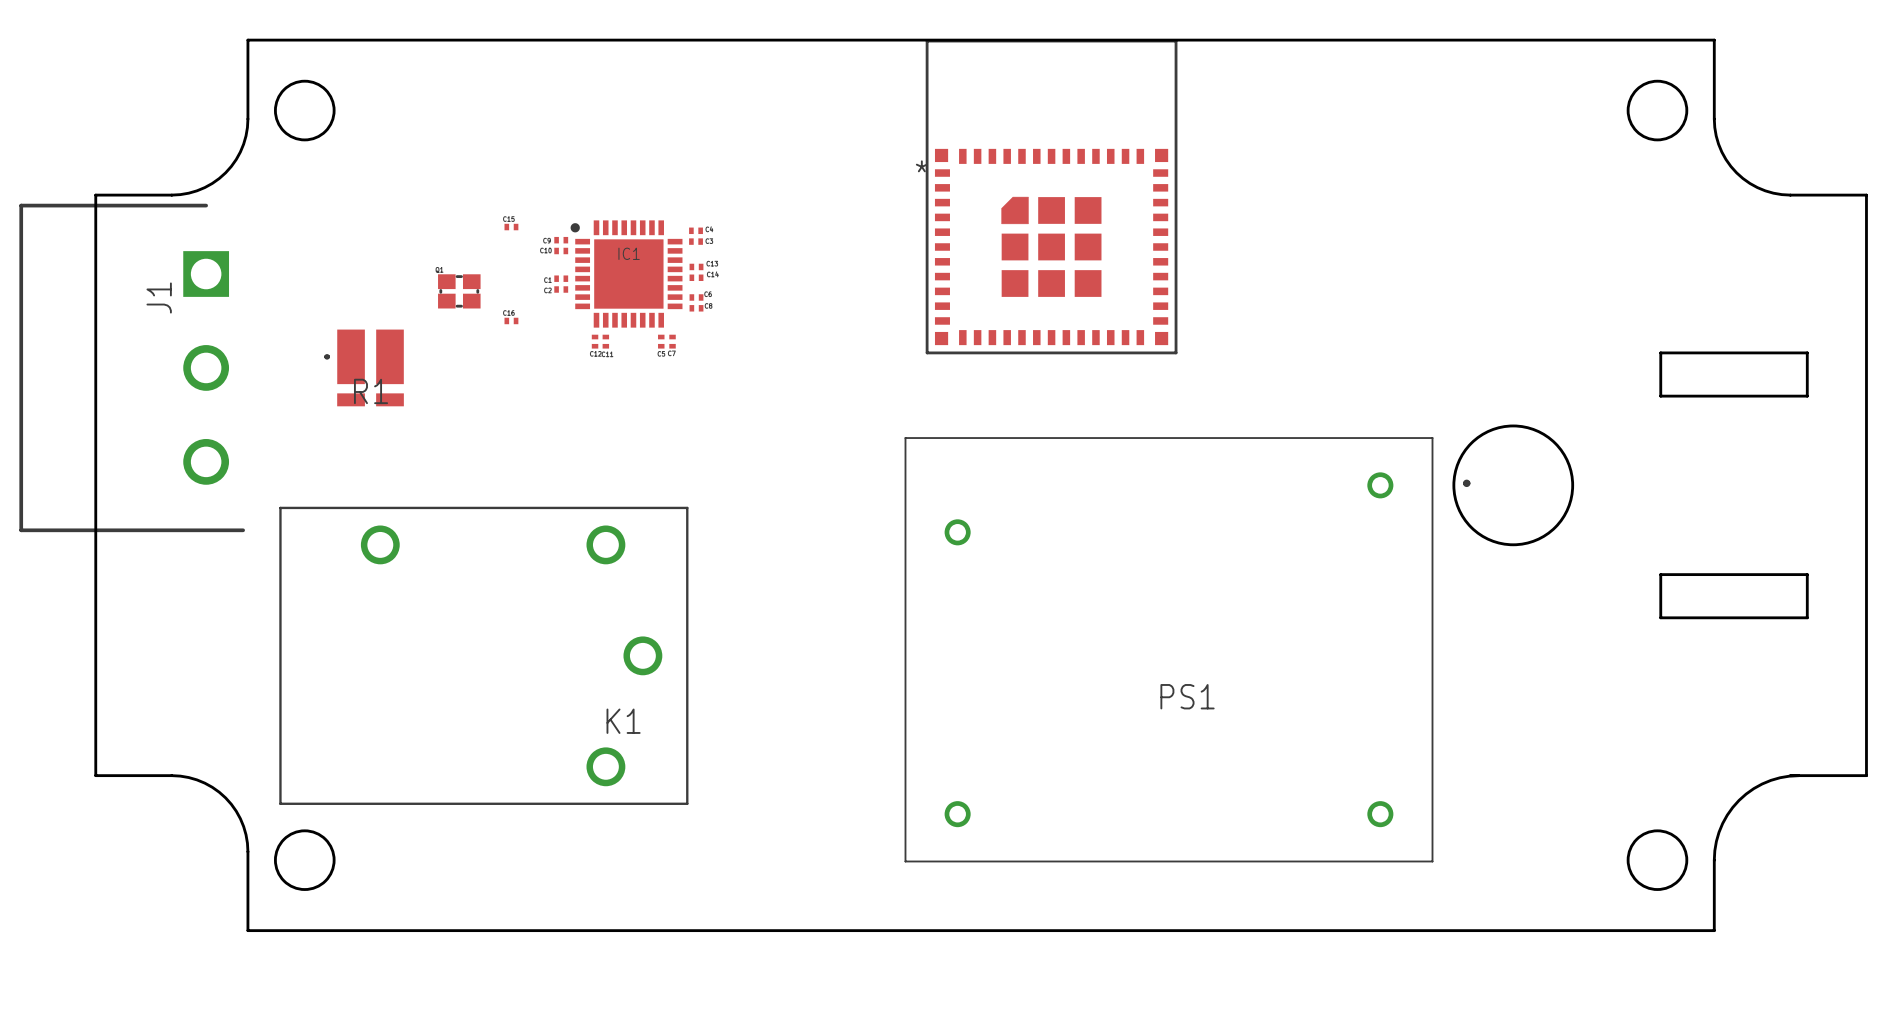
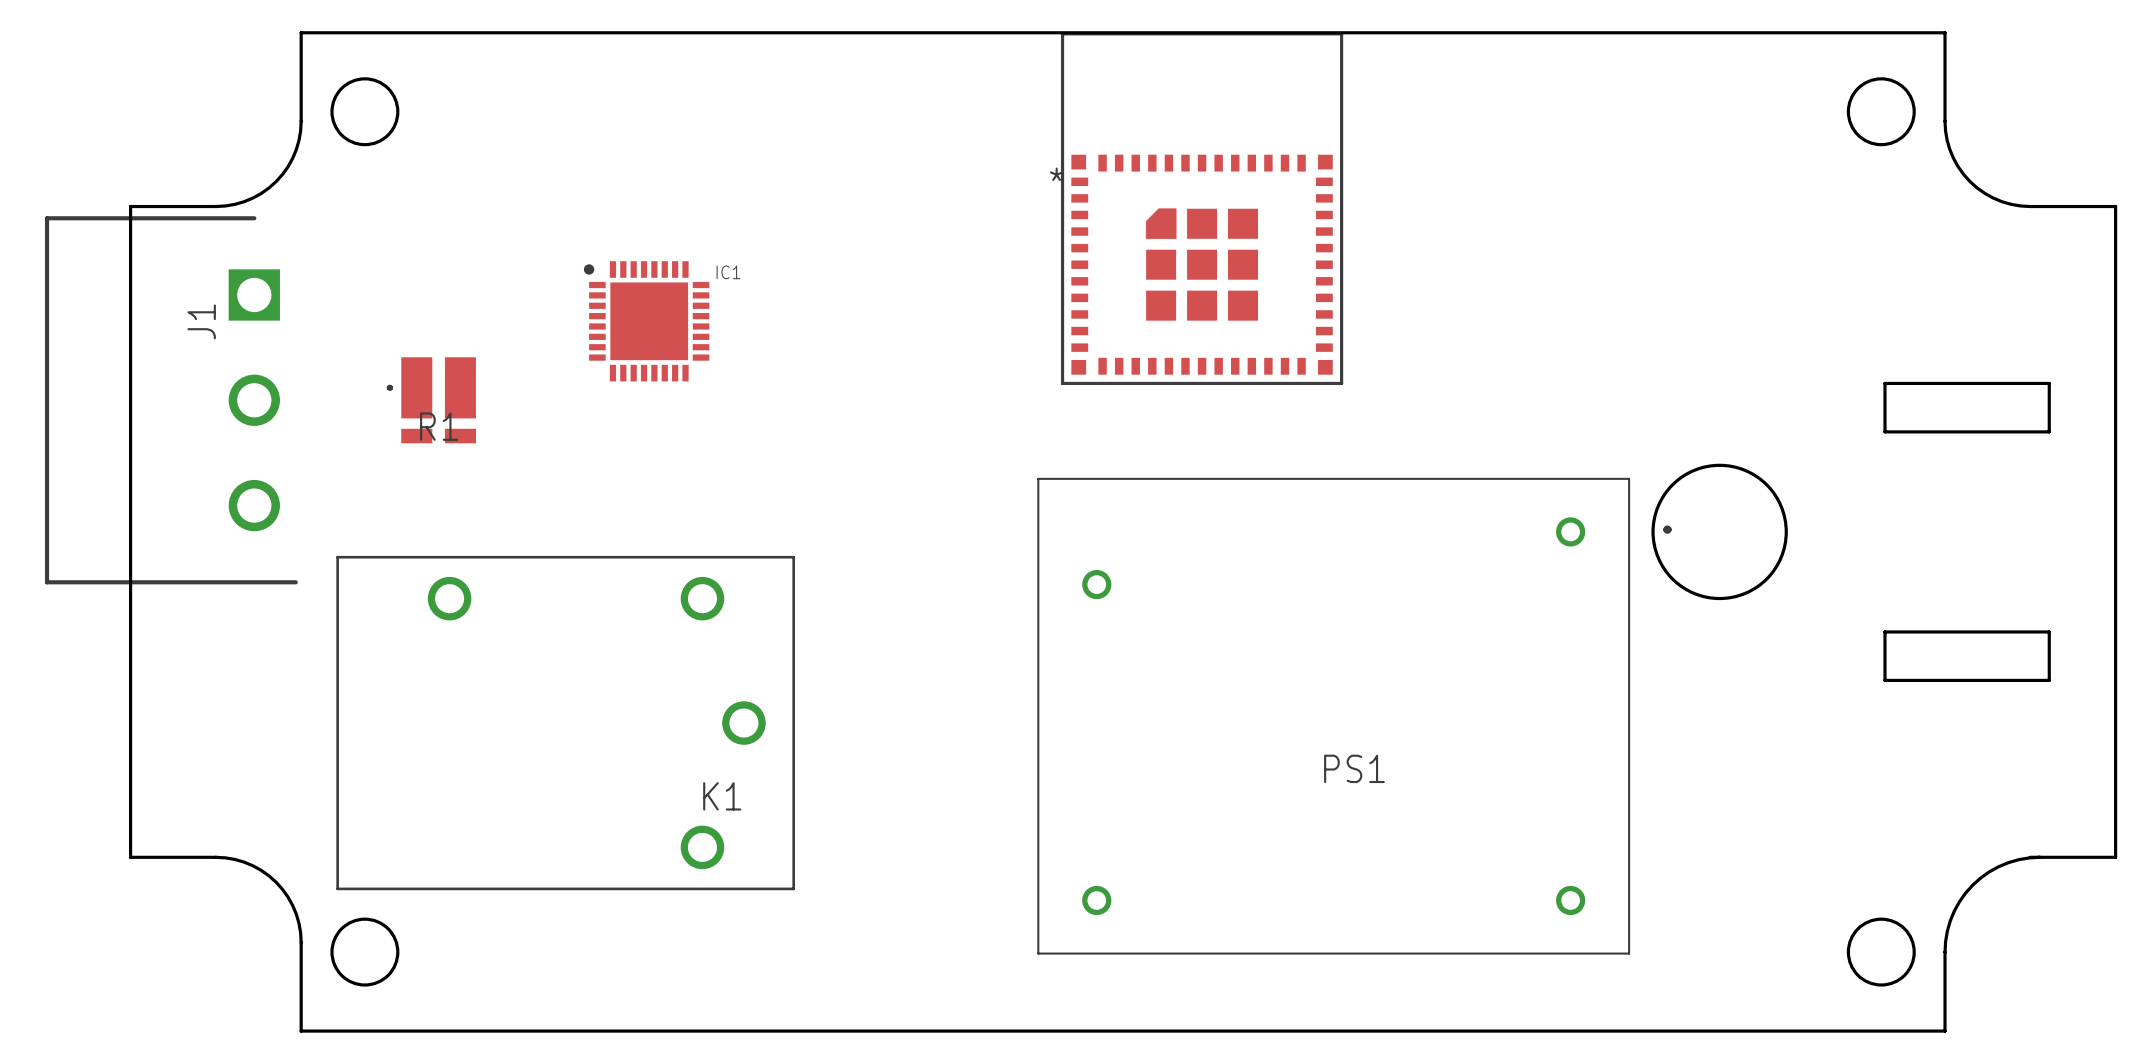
part: (511, 227) -> none
part: (696, 230) -> none
part: (561, 240) -> none
part: (696, 241) -> none
part: (561, 250) -> none
part: (696, 266) -> none
IC1 position: (626, 274) -> (646, 321)
part: (696, 277) -> none
part: (561, 278) -> none
part: (561, 289) -> none
part: (459, 291) -> none
part: (696, 297) -> none
part: (696, 308) -> none
part: (511, 320) -> none
part: (595, 341) -> none
part: (605, 341) -> none
part: (661, 341) -> none
part: (672, 341) -> none

